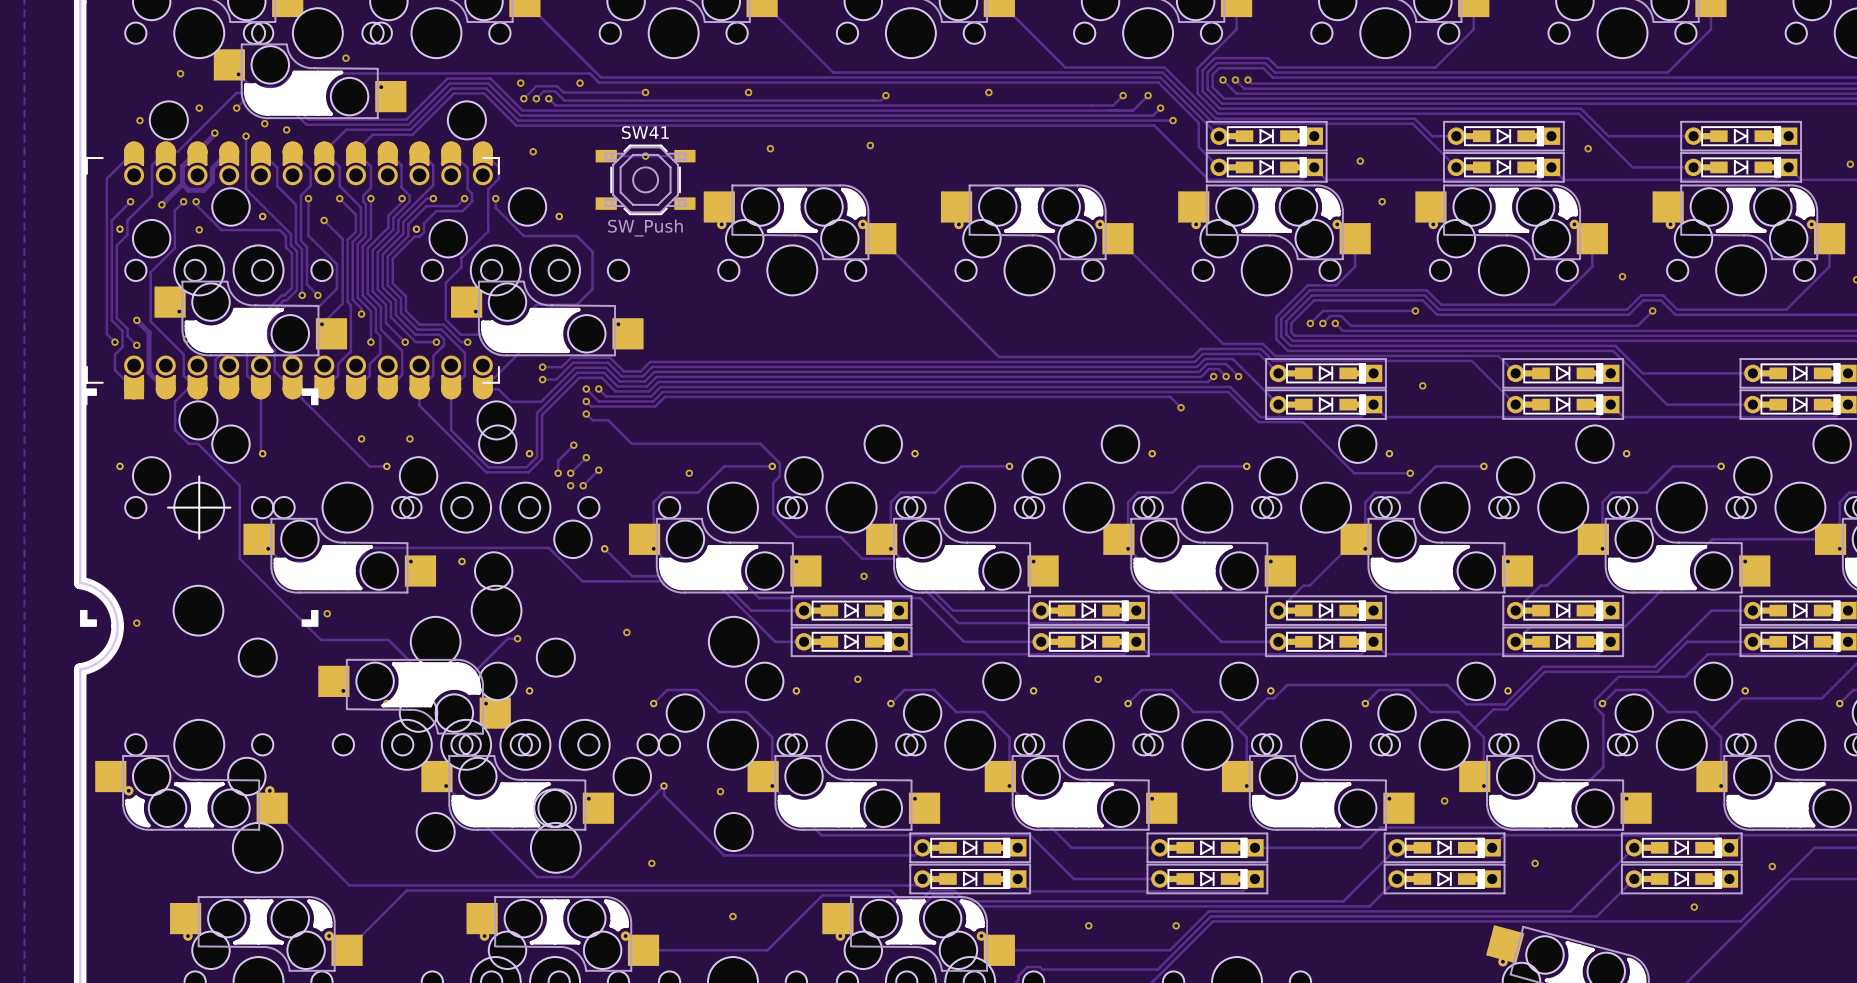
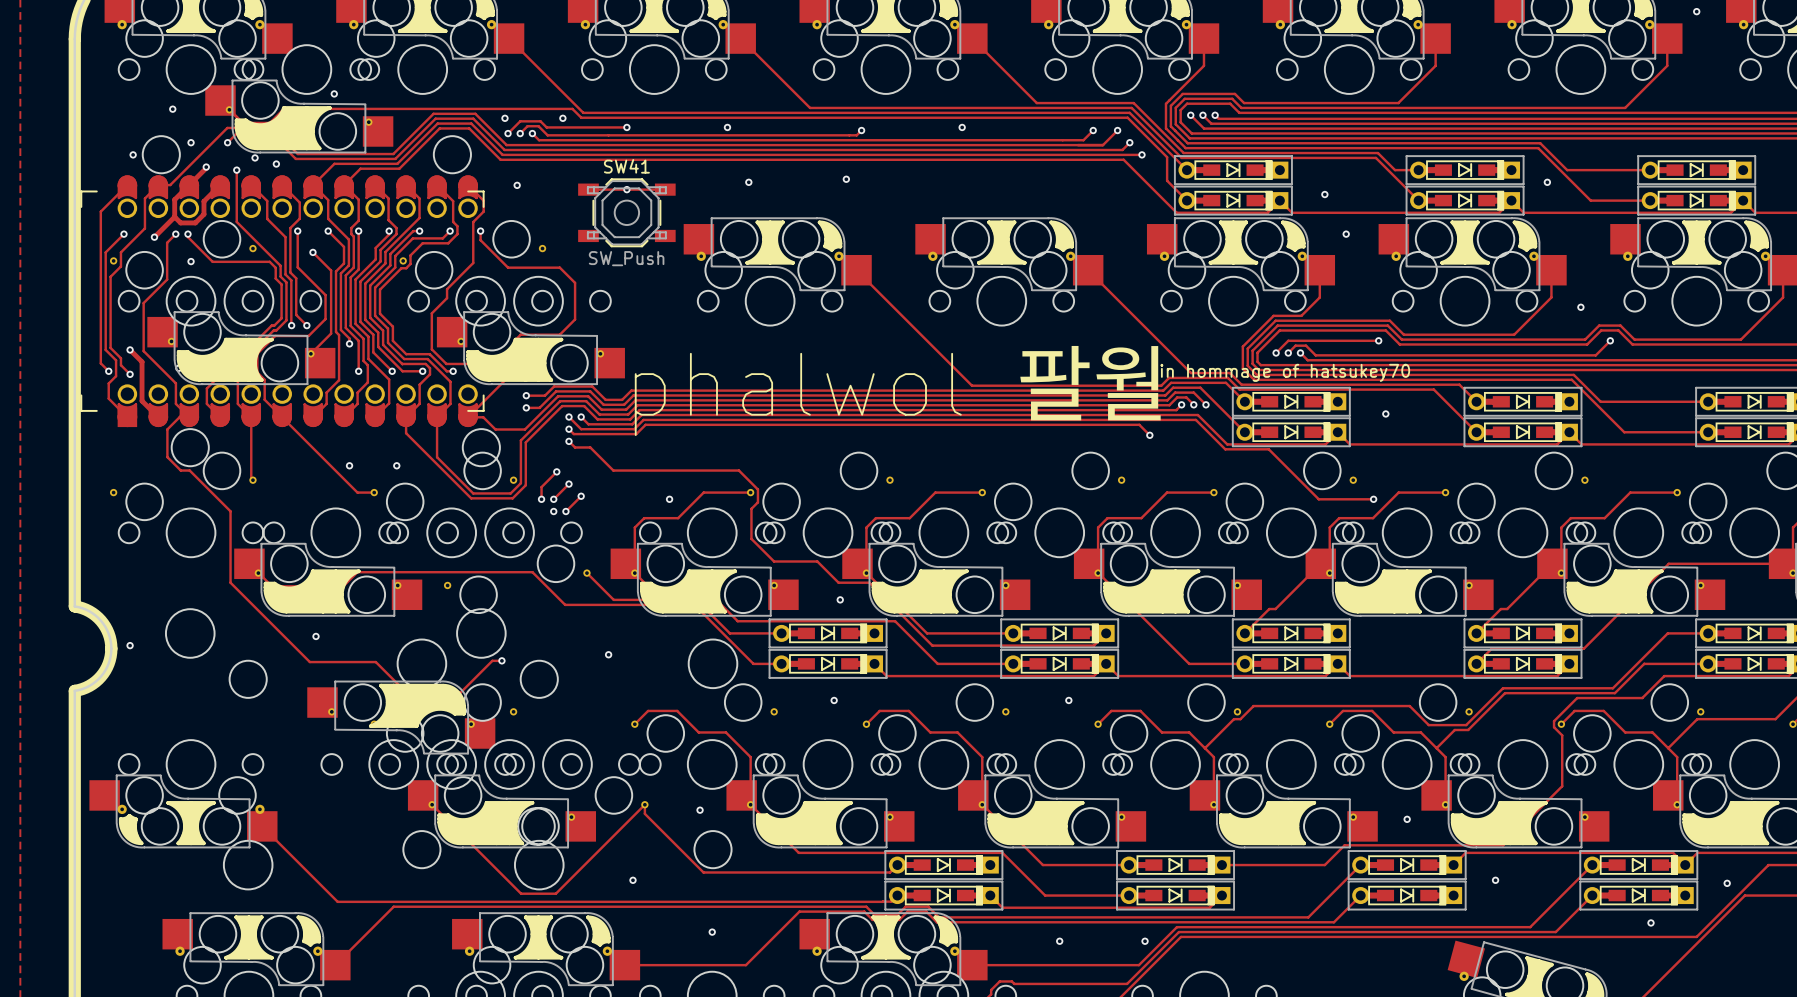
text: none -> in hommage of hatsukey70 (1285, 372)
text: none -> phalwol 팔월 (898, 390)
drawing: [80, 388, 319, 627] -> none

